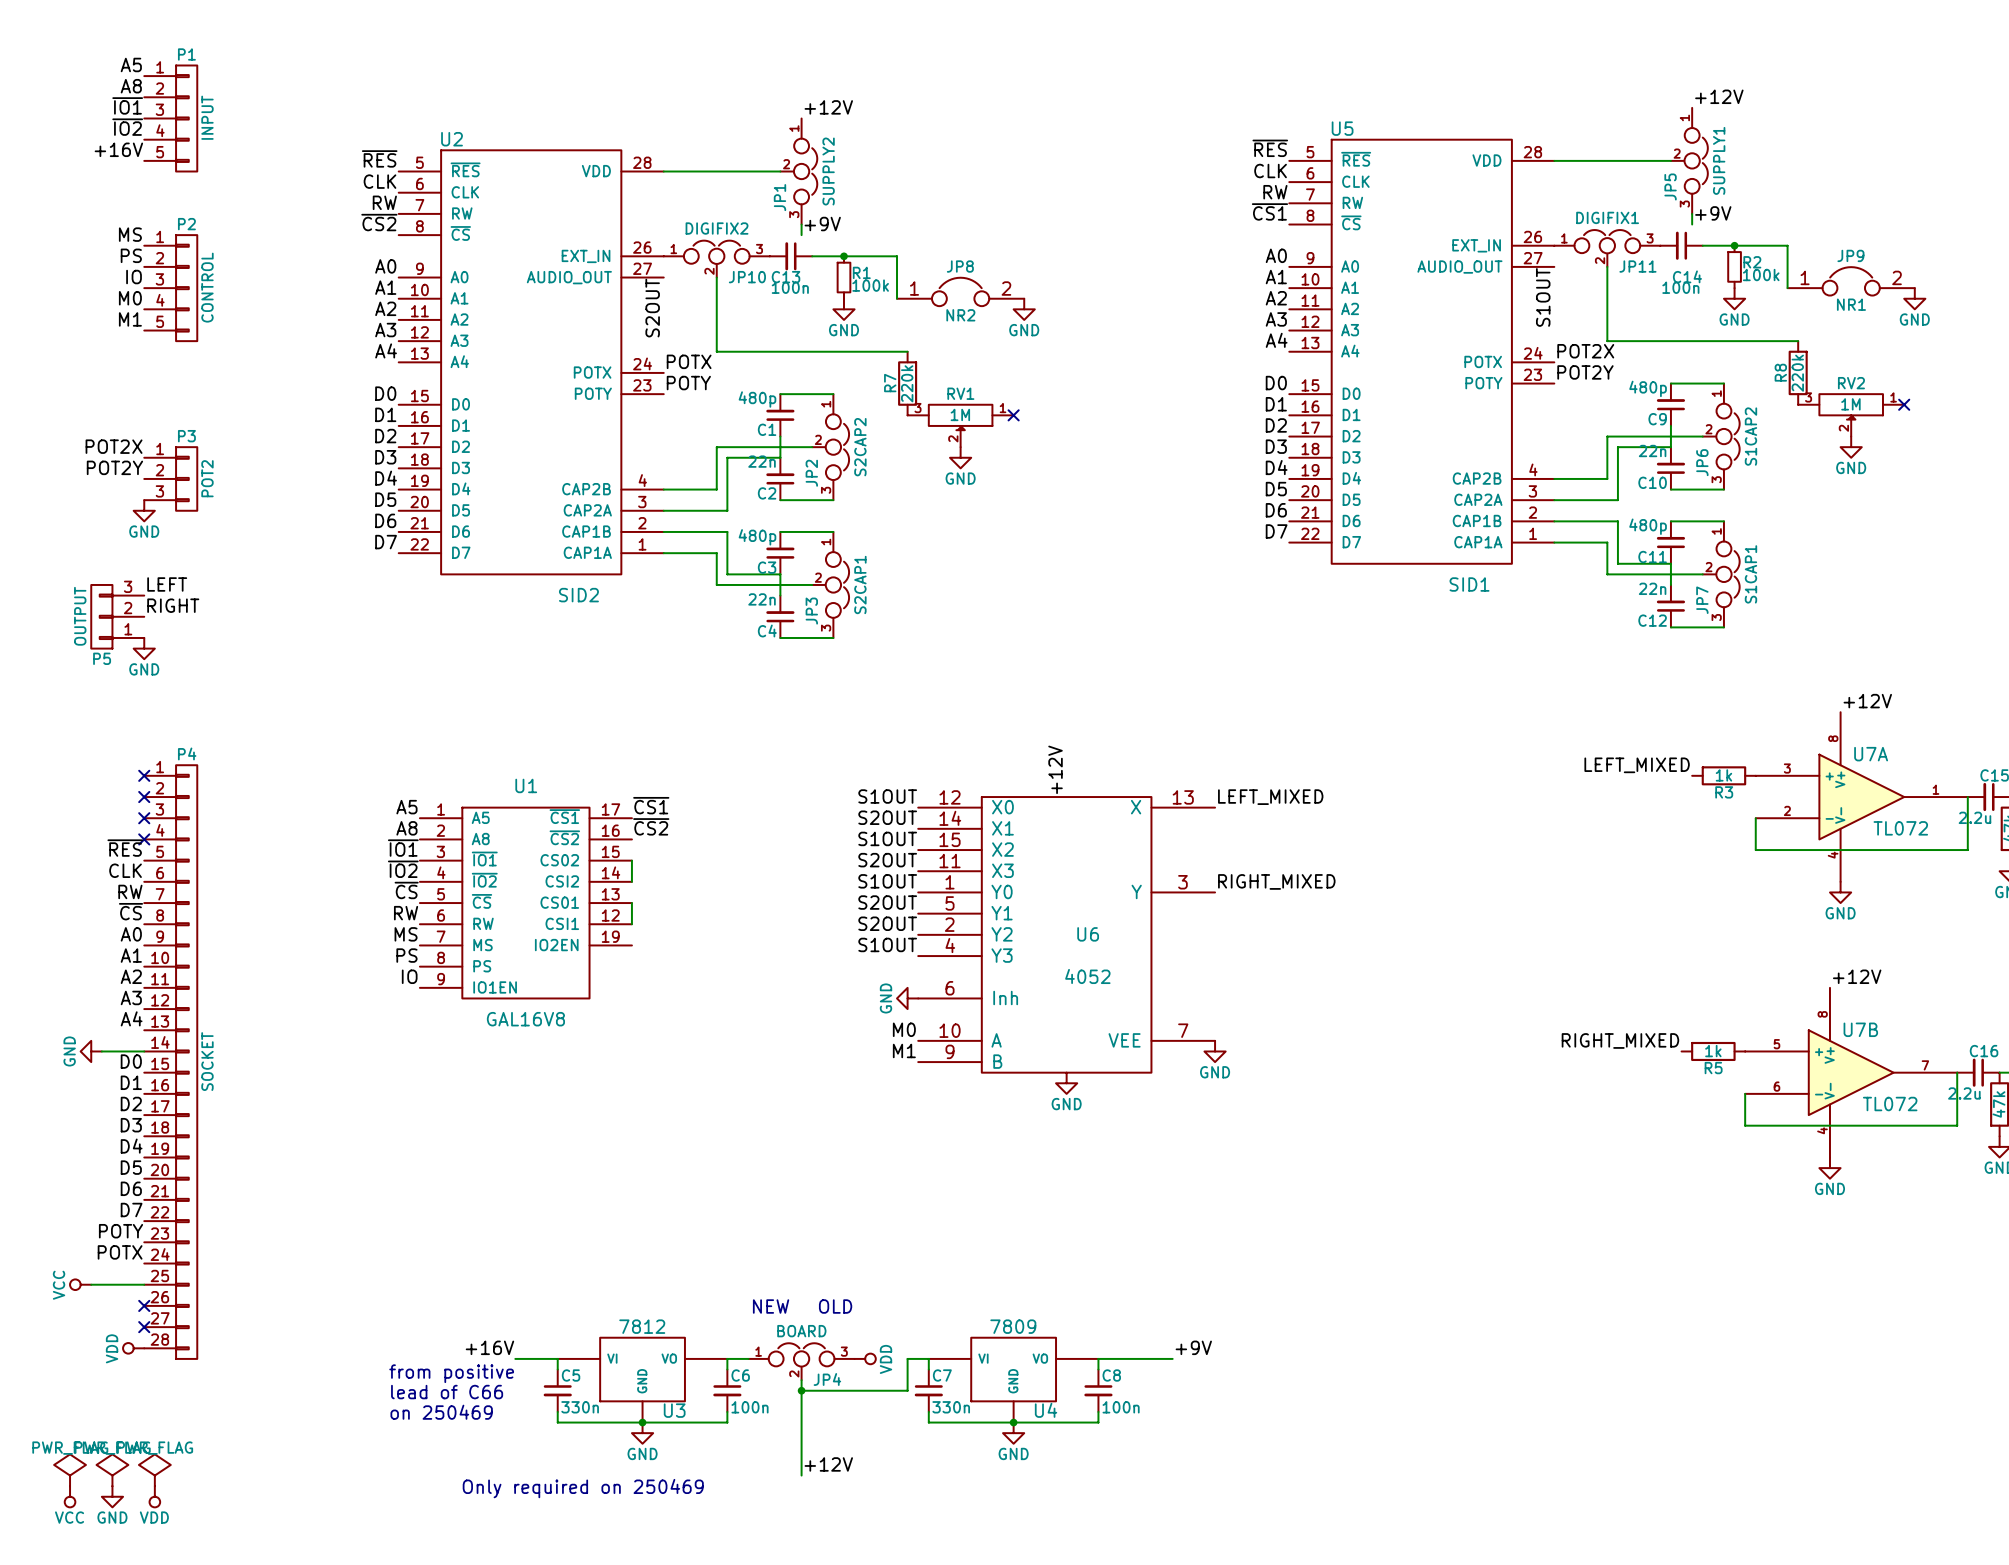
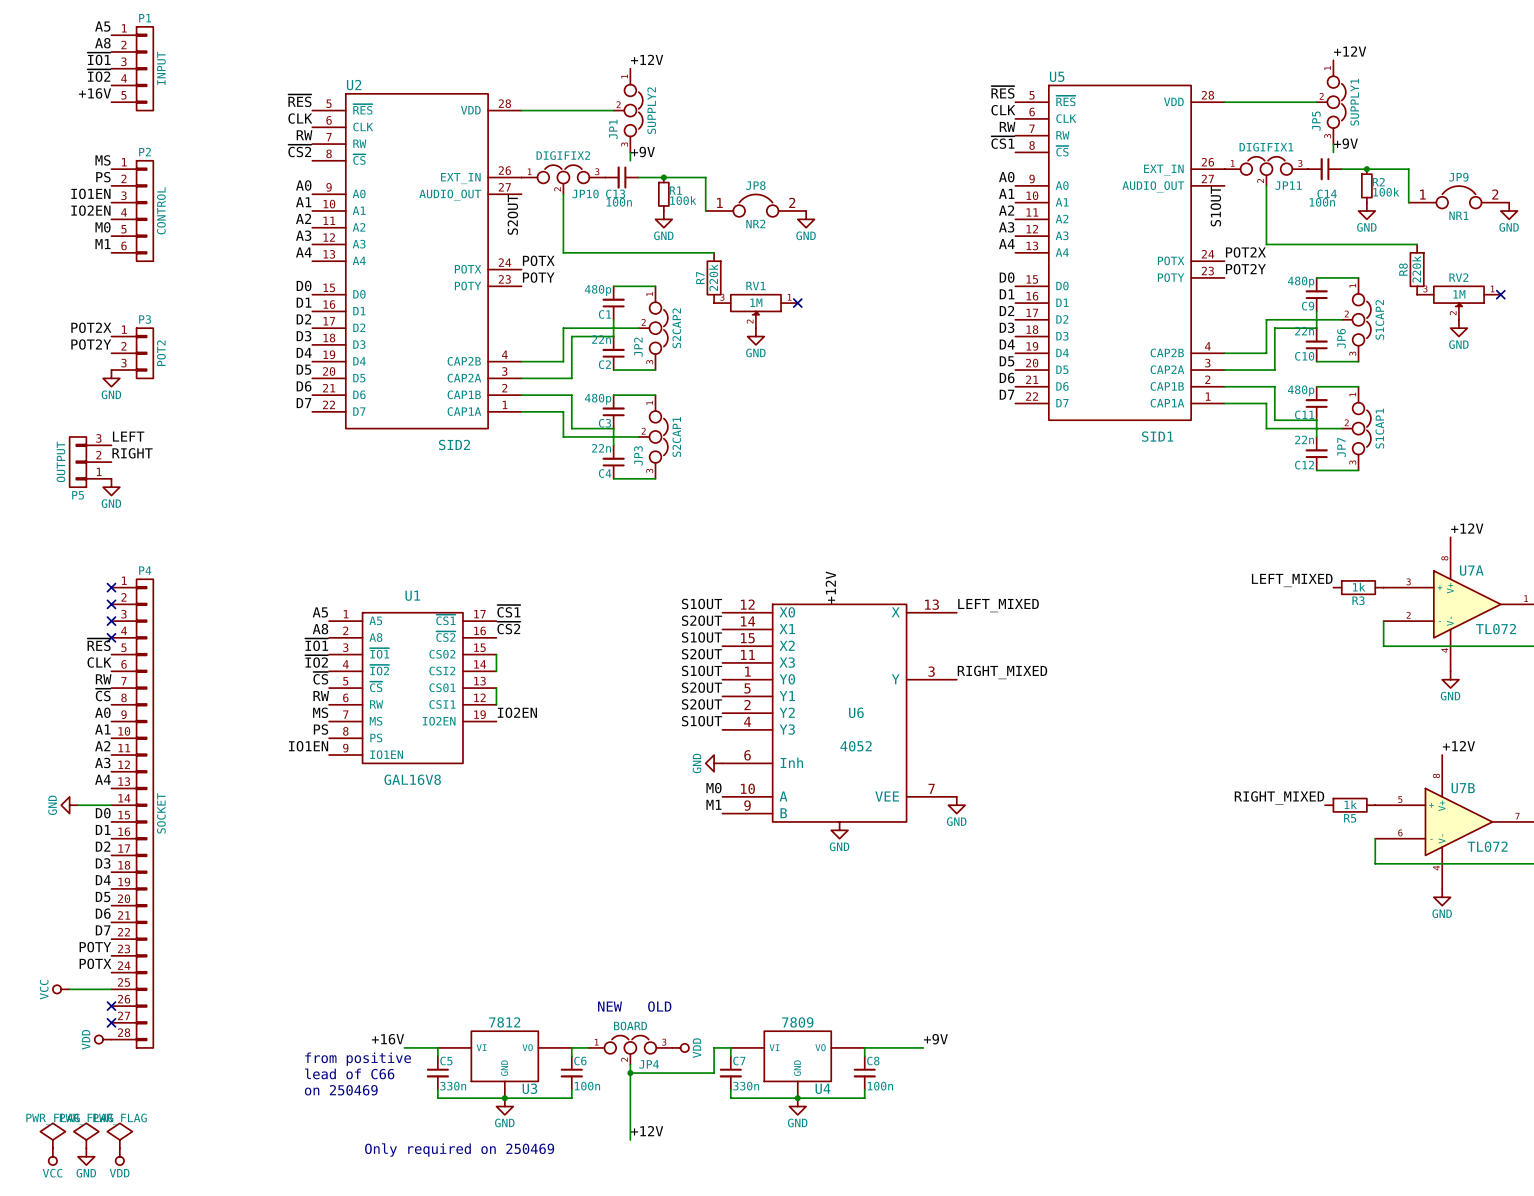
P2 symbol: [144, 235, 198, 342] -> [111, 160, 154, 262]
label: IO (134, 277) -> IO1EN (90, 193)
label: M0 (130, 298) -> IO2EN (90, 210)
label: M1 (130, 319) -> M0 (103, 227)
label: none -> M1 (103, 244)
label: none -> IO2EN (517, 712)
label: IO (409, 976) -> IO1EN (308, 746)

